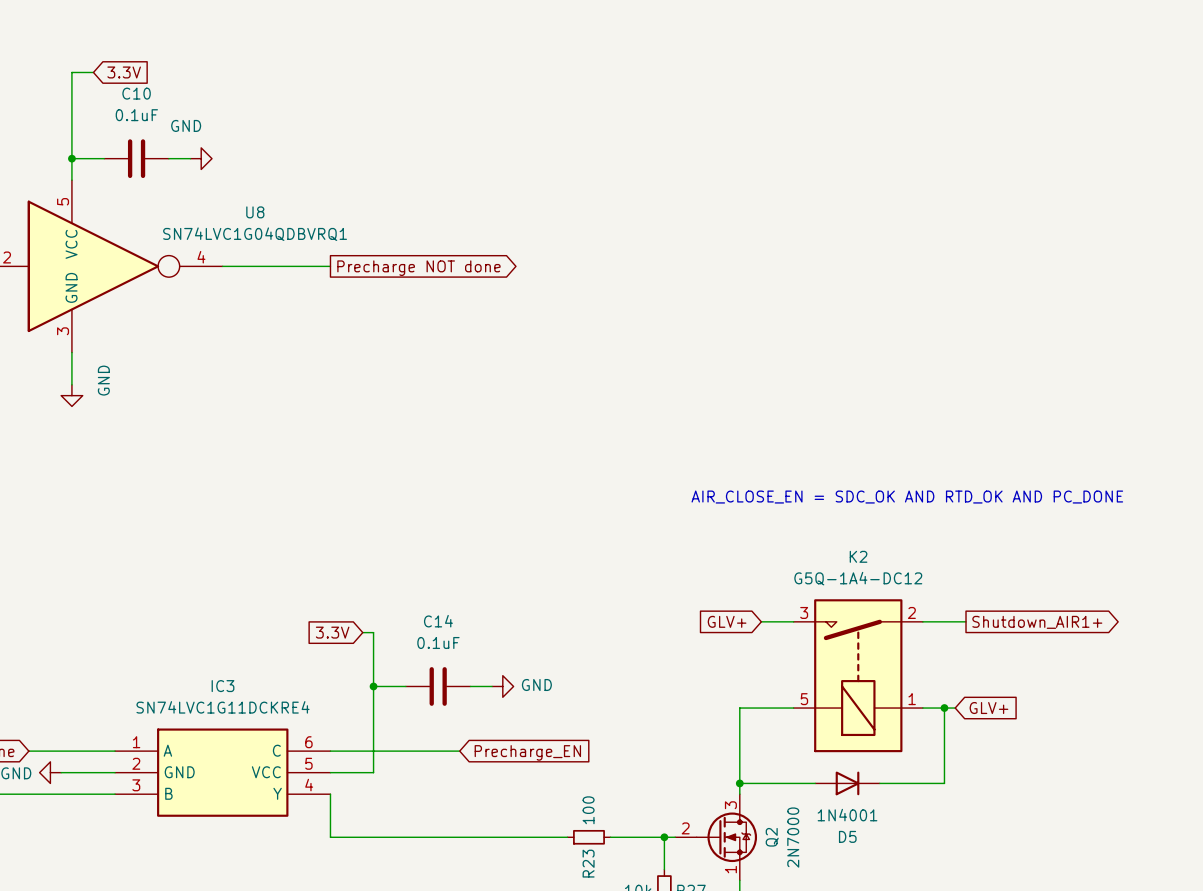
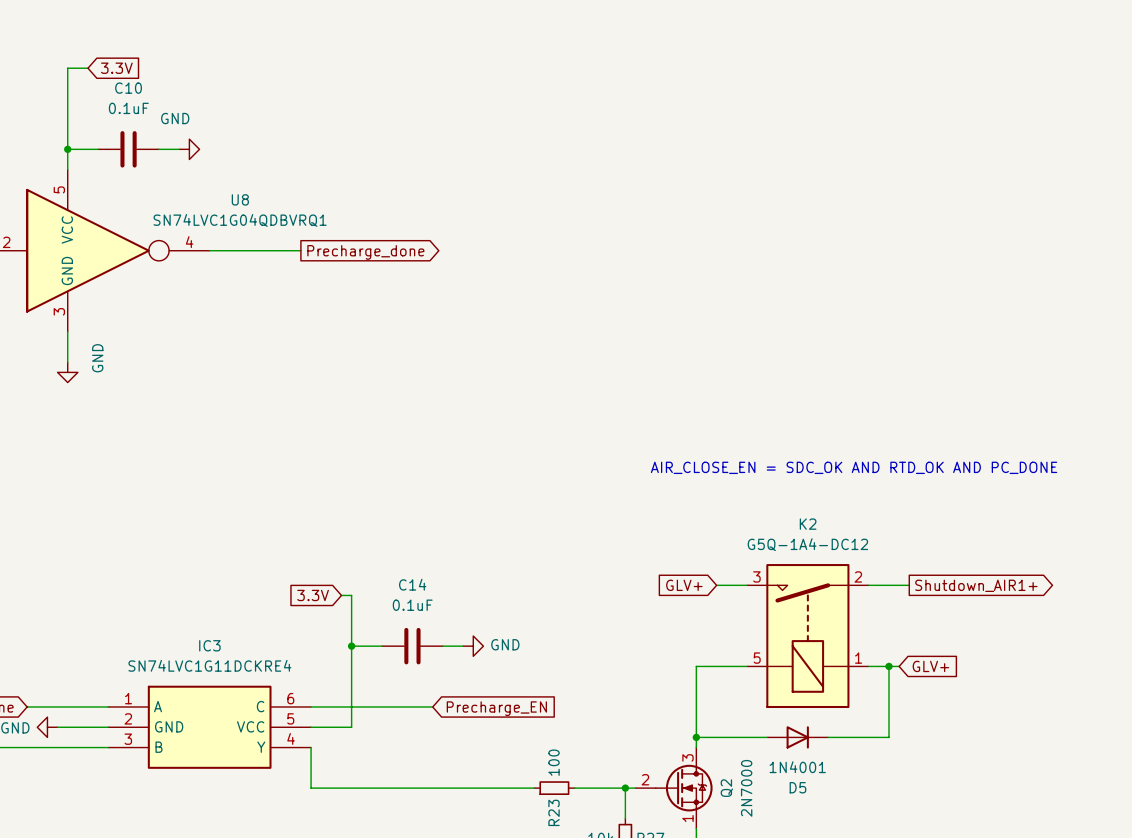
wire: (319, 266) (330, 266) -> none
global label: Precharge NOT done (418, 268) -> Precharge_done (365, 252)

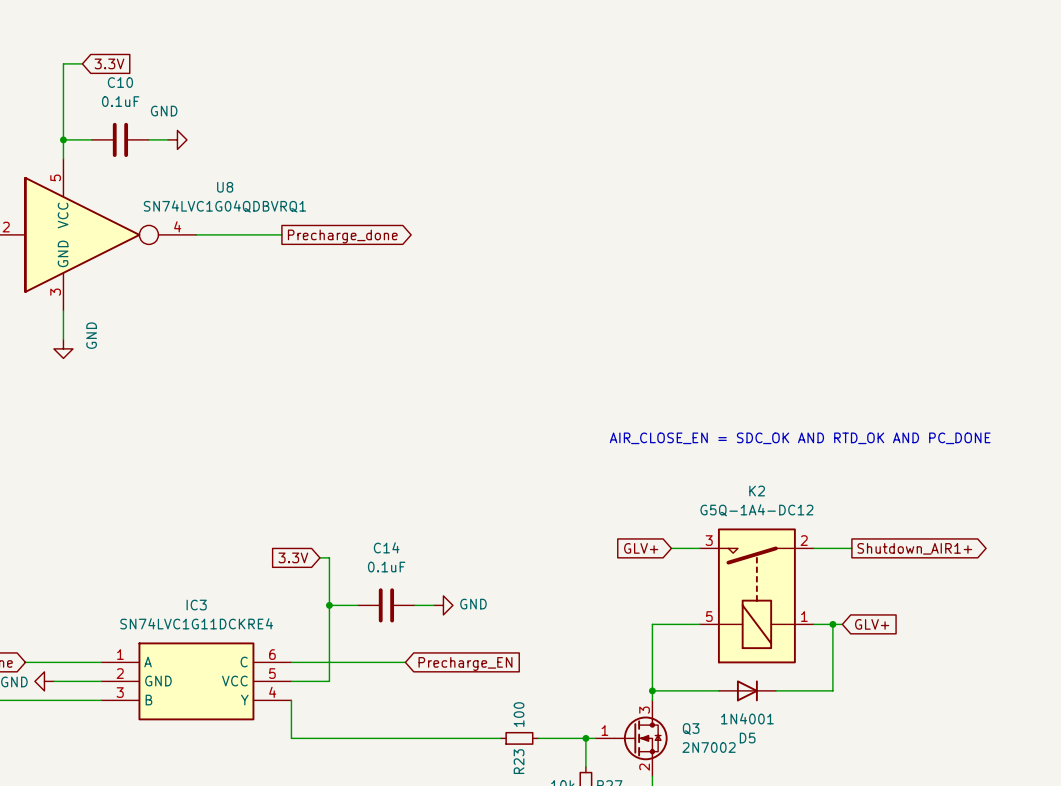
Q2: 2N7000 (674, 788) -> none
Q3: none -> 2N7002 (631, 738)

